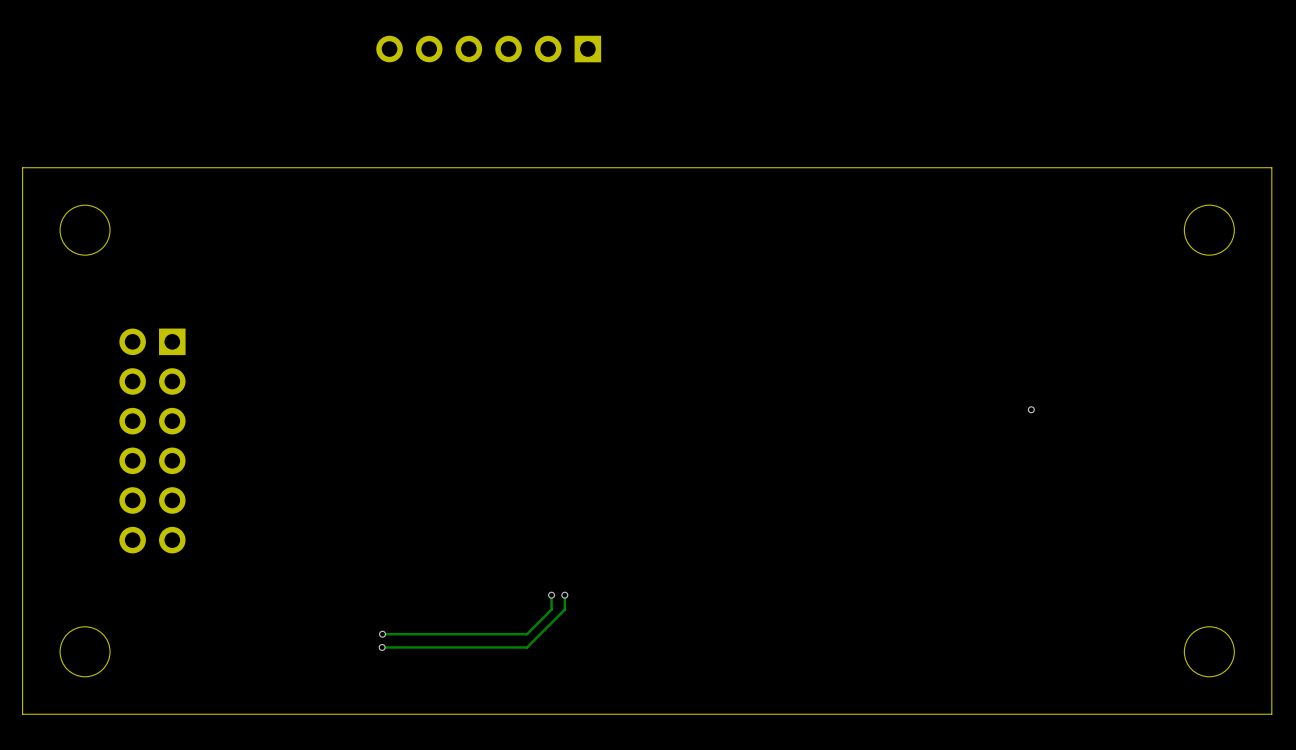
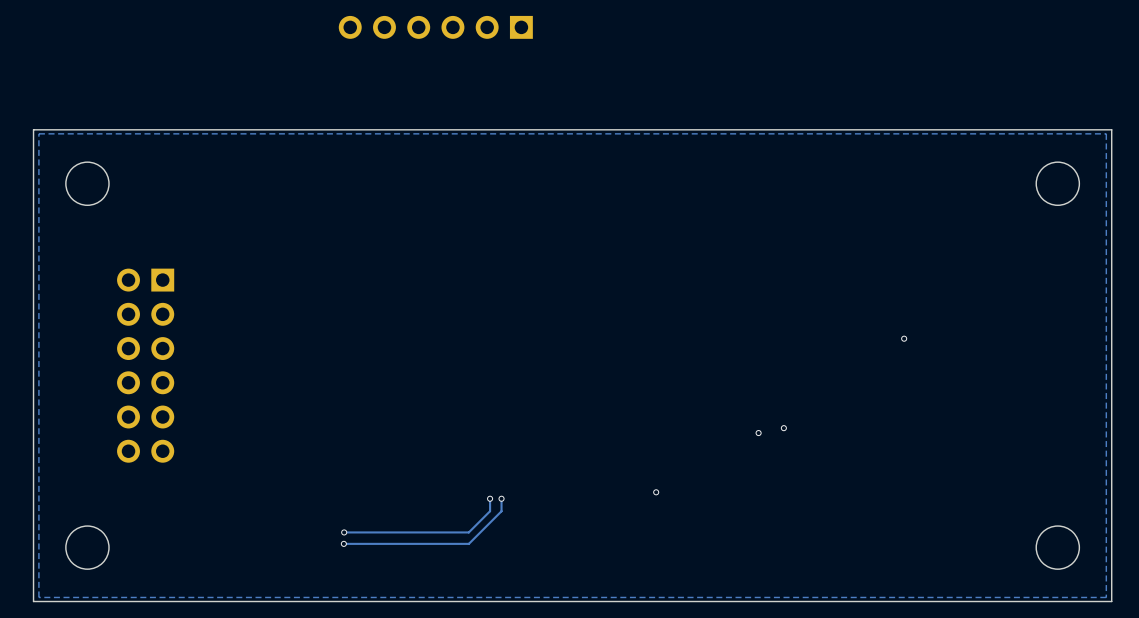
zone outline: none -> (1106, 133) (1106, 597) (38, 597) (38, 133) (1106, 133)
via: none -> (783, 428)
via: none -> (758, 433)
via: none -> (656, 492)

